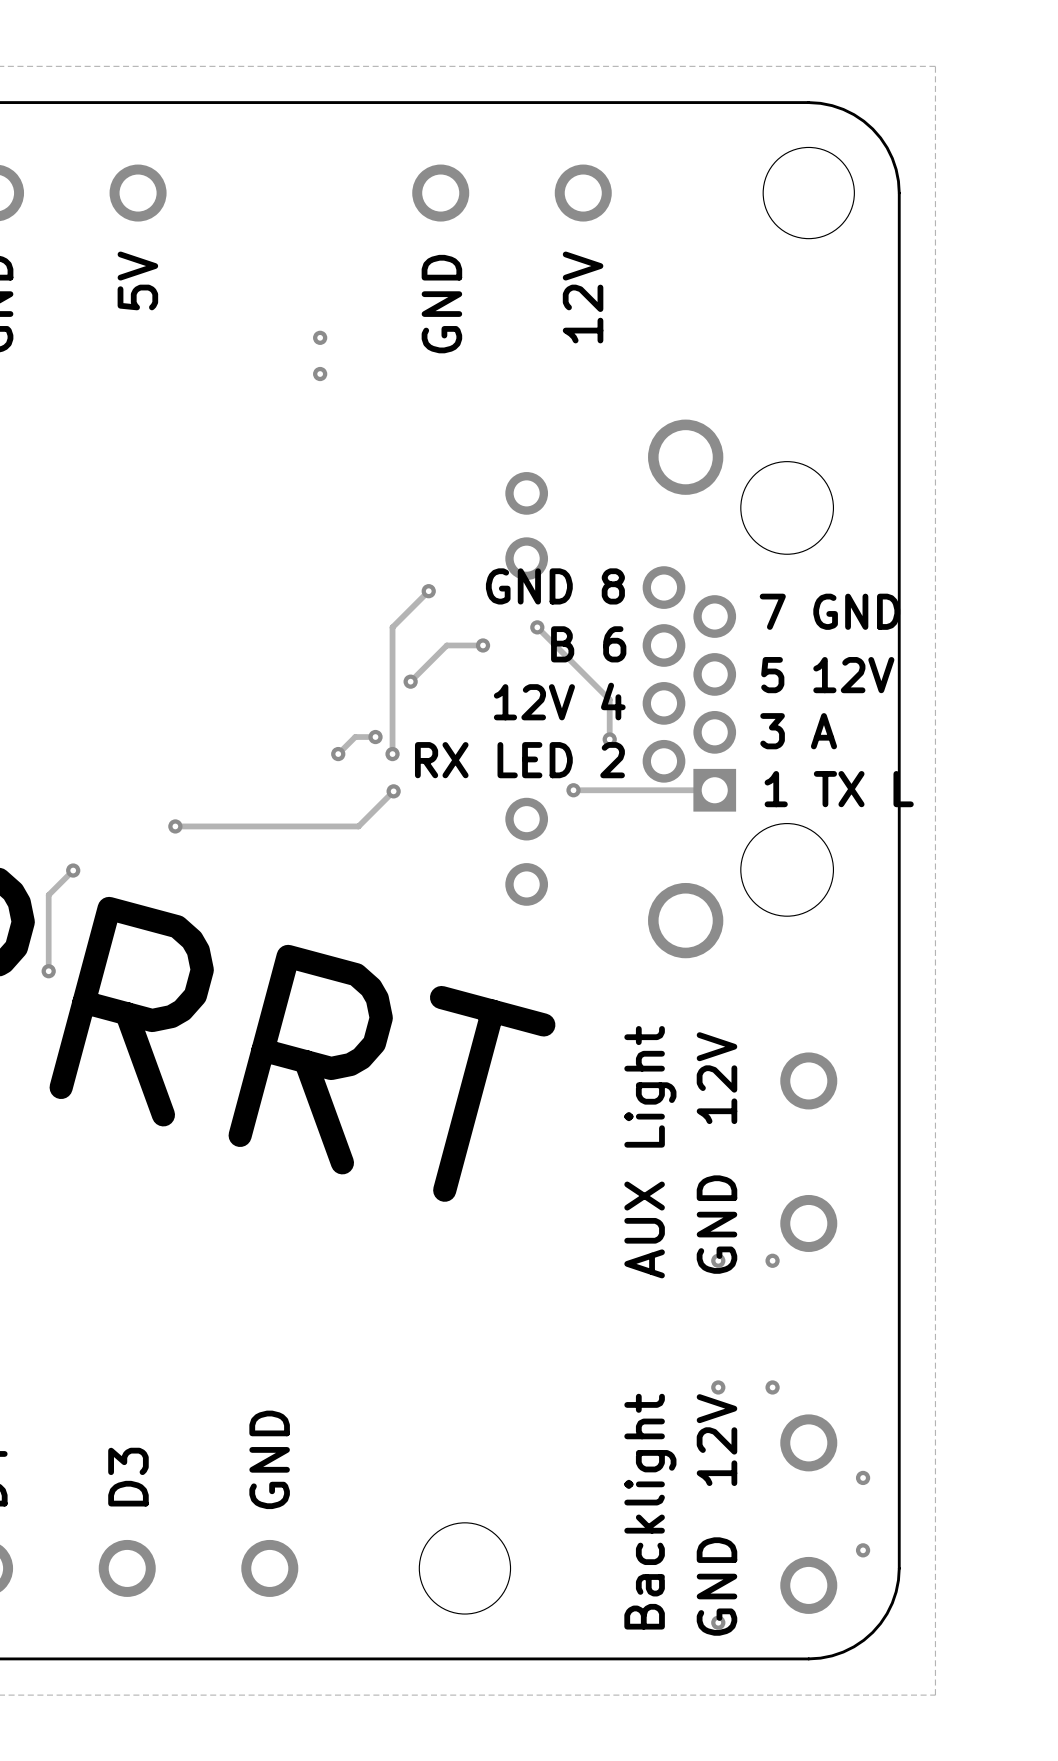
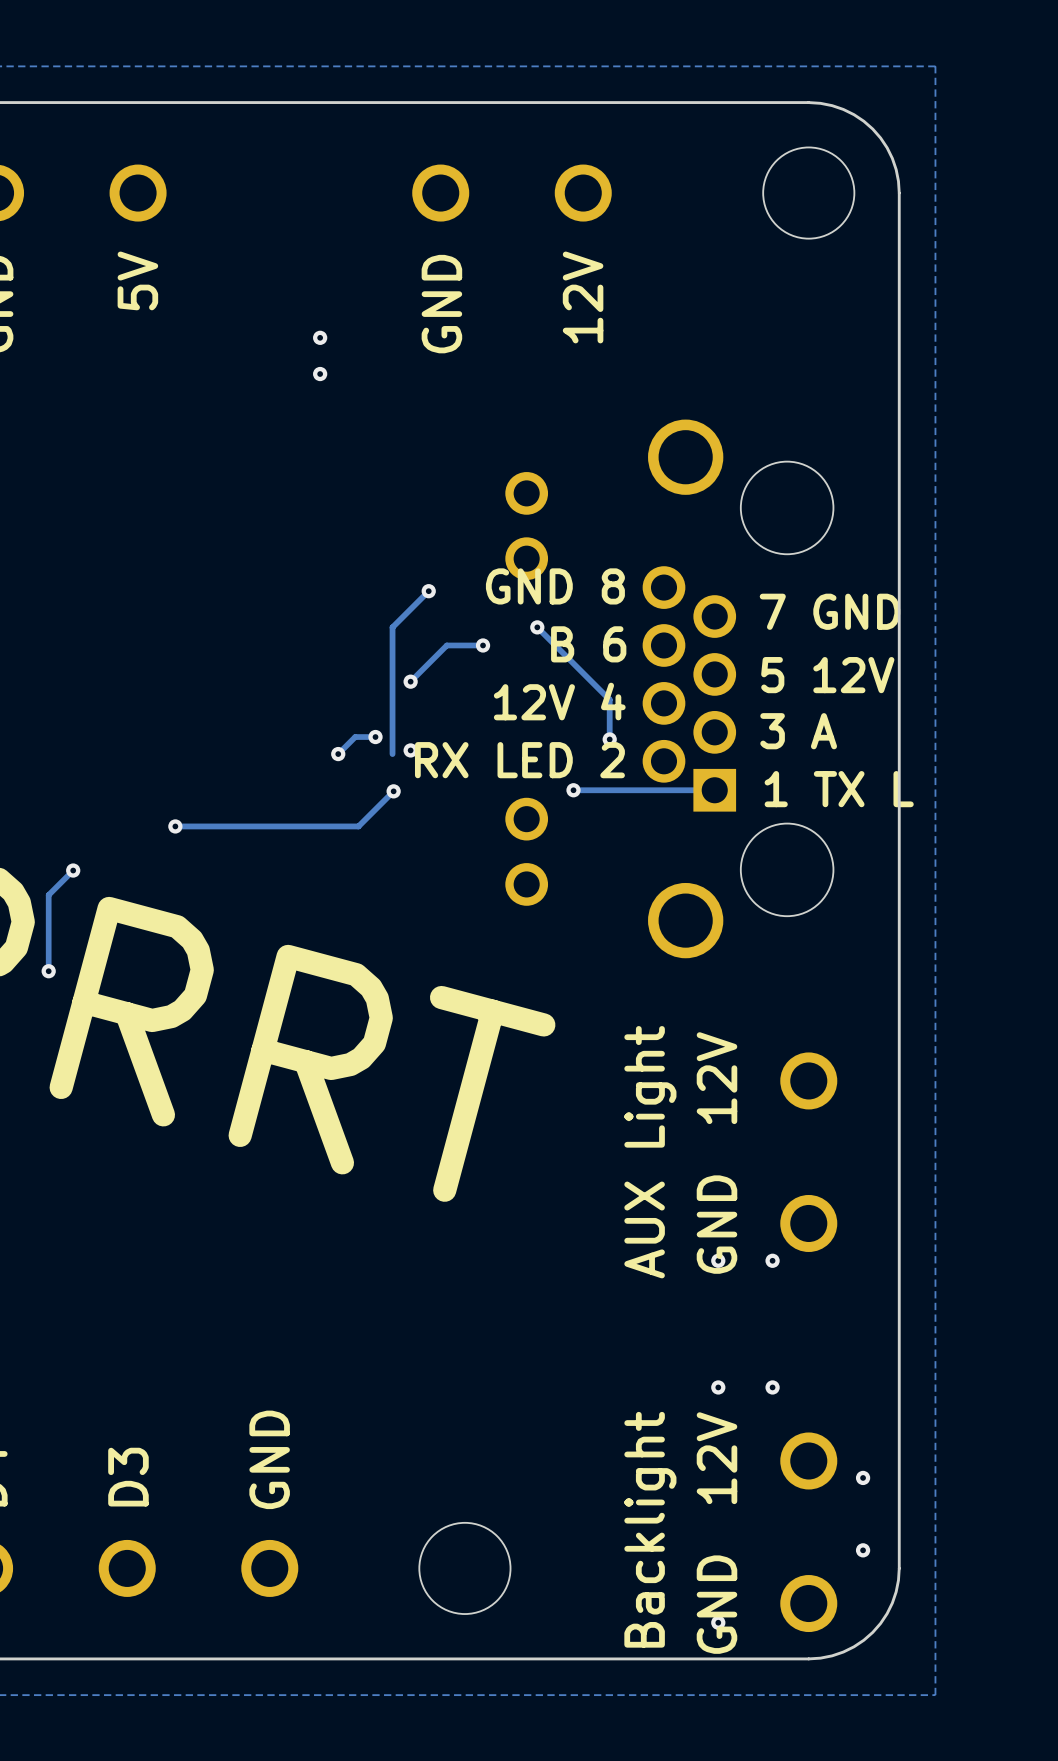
via position: (392, 754) -> (410, 750)
part position: (808, 1514) -> (808, 1532)

